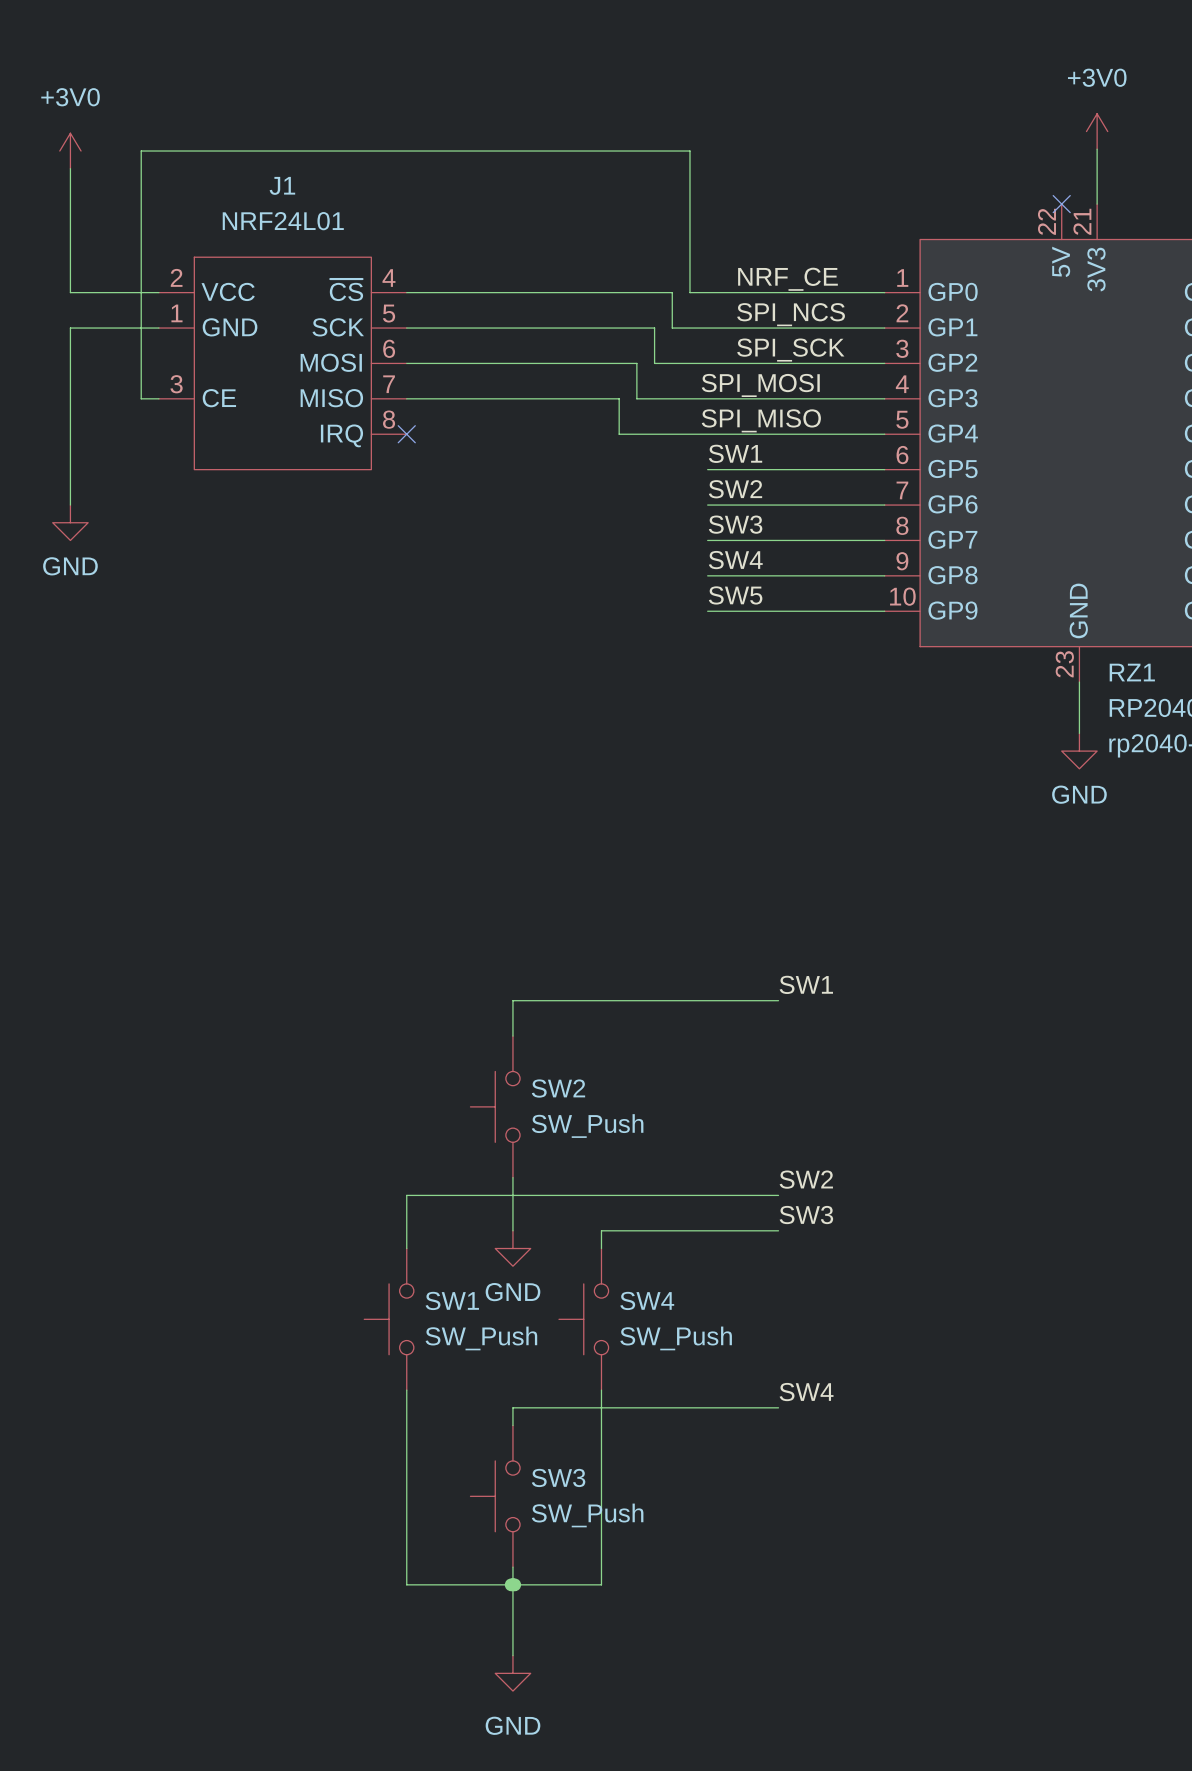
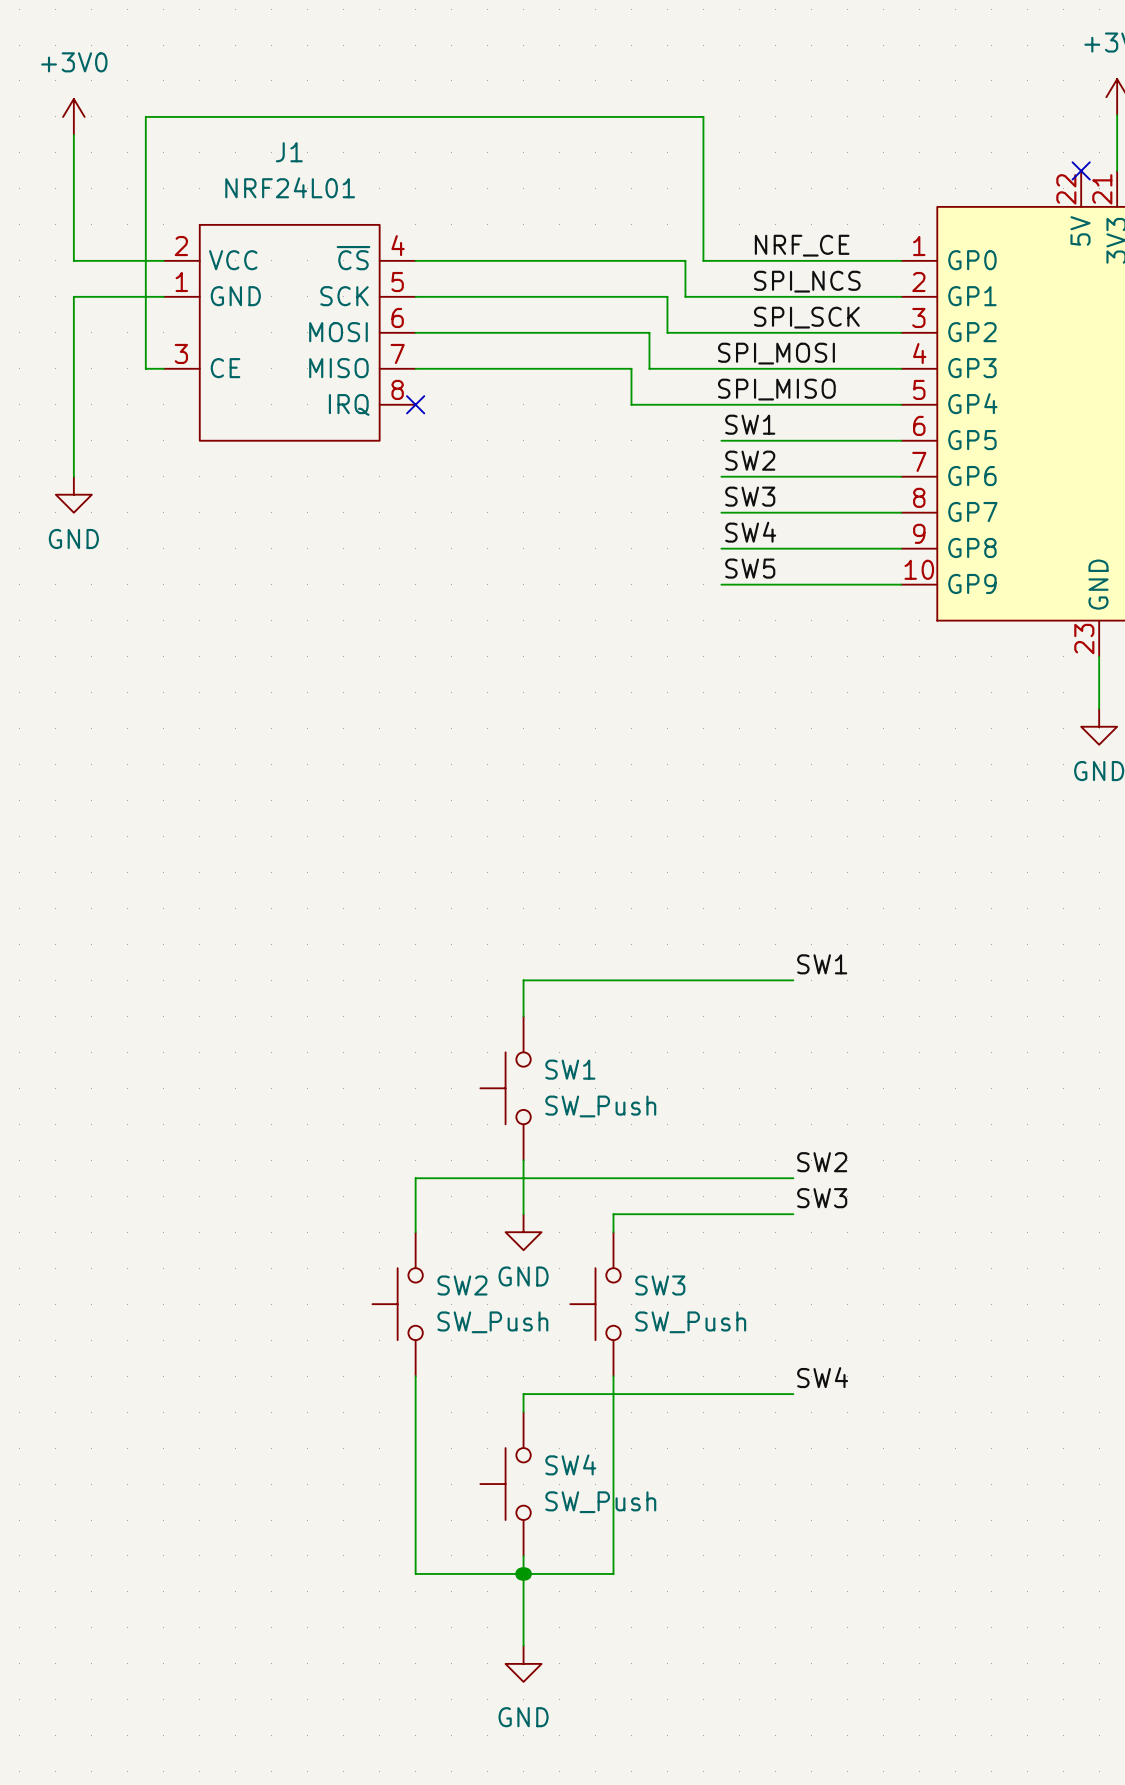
SW2 name: SW2 (558, 1088) -> SW1 (570, 1069)
SW1 name: SW1 (452, 1300) -> SW2 (462, 1285)
SW4 name: SW4 (647, 1300) -> SW3 (660, 1285)
SW3 name: SW3 (558, 1477) -> SW4 (570, 1464)

